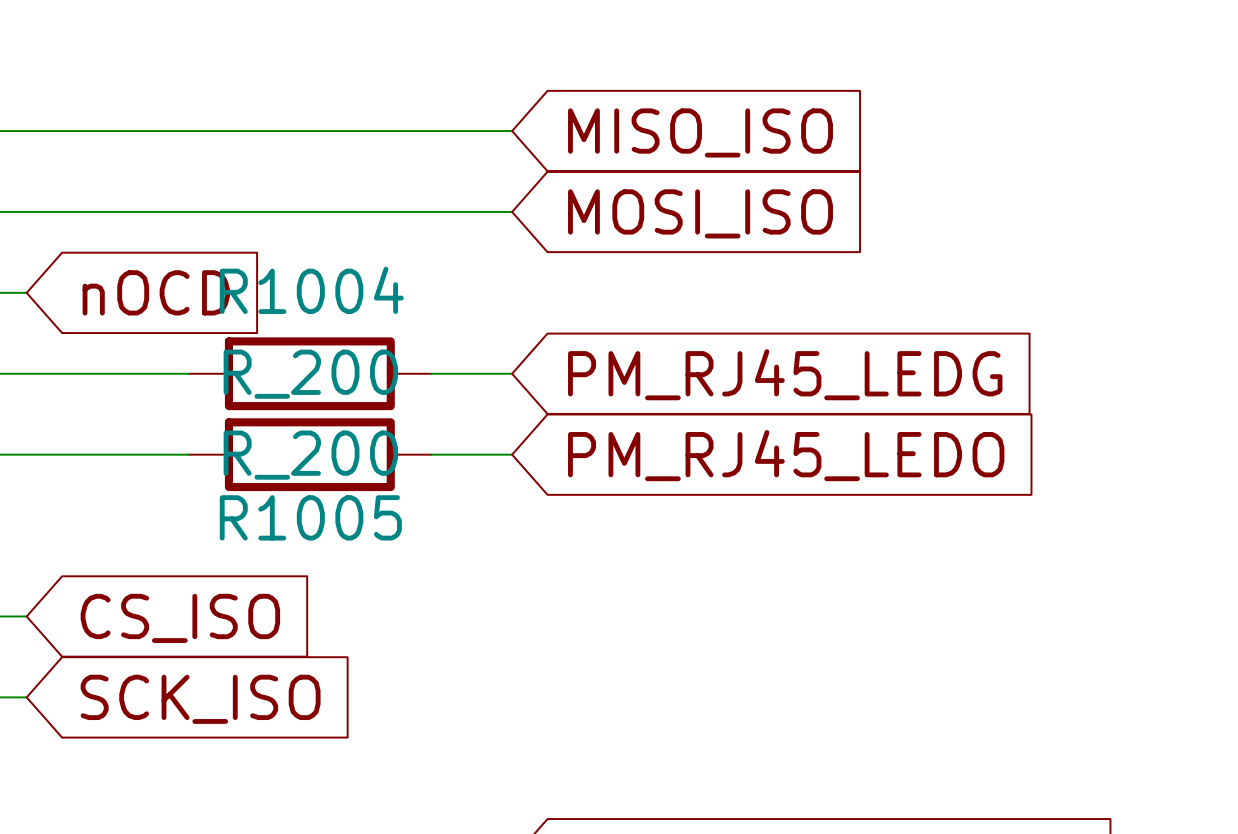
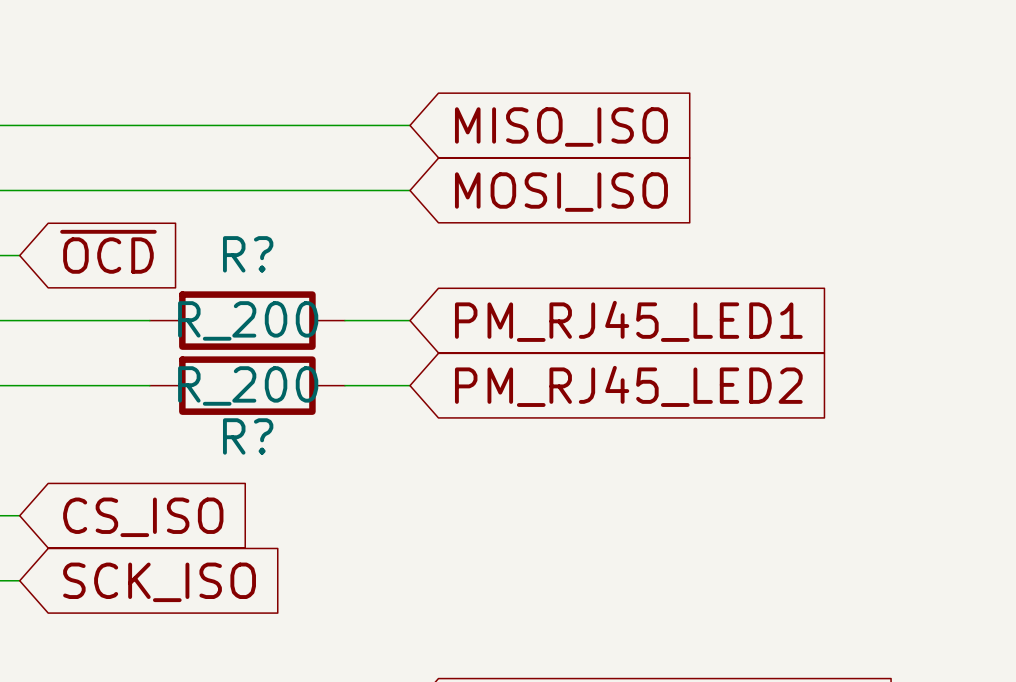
R1004 name: R1004 (311, 290) -> R? (248, 254)
global label: nOCD (156, 292) -> ~{OCD} (108, 251)
global label: PM_RJ45_LEDG (785, 374) -> PM_RJ45_LED1 (628, 321)
global label: PM_RJ45_LEDO (786, 455) -> PM_RJ45_LED2 (628, 386)
R1005 name: R1005 (310, 517) -> R? (248, 436)

